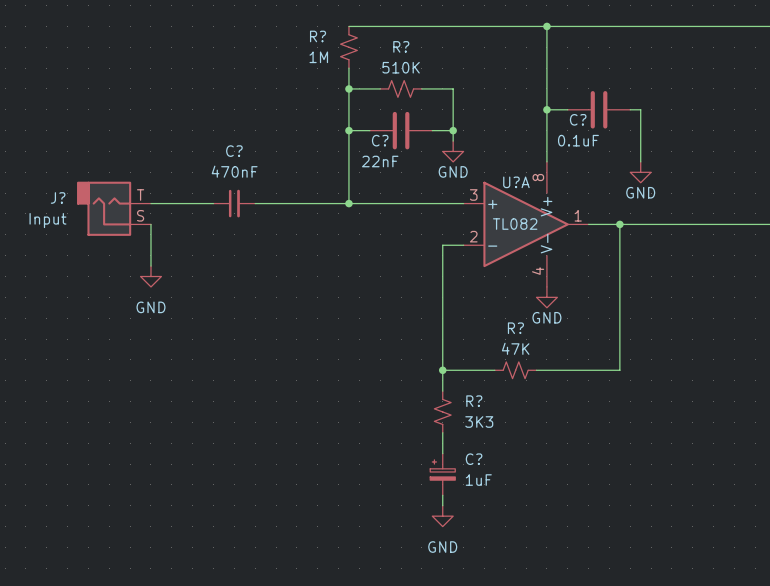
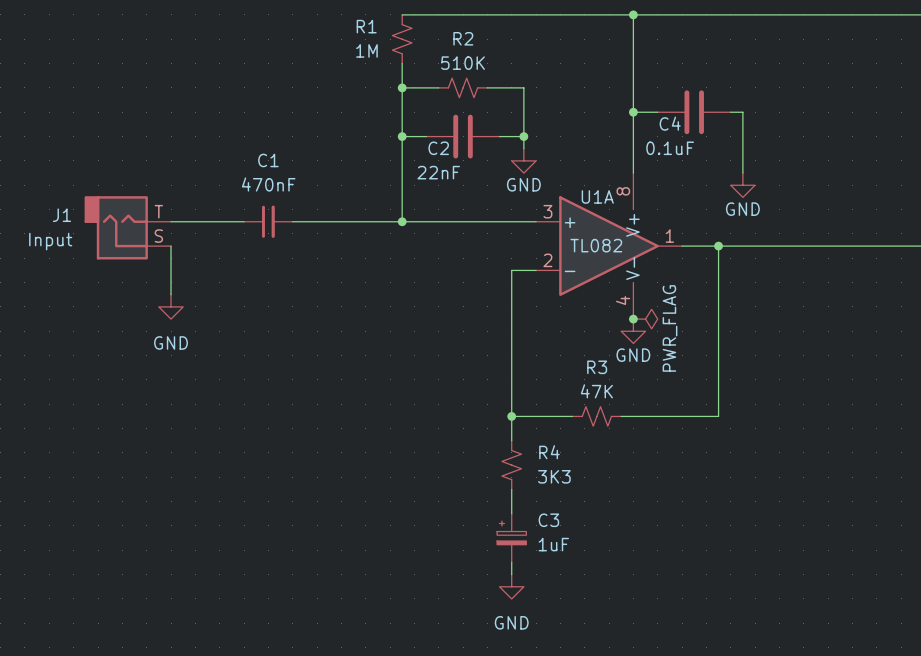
R? name: R? (318, 36) -> R1 (366, 26)
R? name: R? (401, 46) -> R2 (463, 38)
C? name: C? (578, 119) -> C4 (670, 123)
C? name: C? (380, 140) -> C2 (438, 148)
C? name: C? (234, 151) -> C1 (268, 160)
U?A name: U?A (516, 182) -> U1A (597, 196)
J? name: J? (58, 197) -> J1 (61, 215)
junction: none -> (633, 319)
power symbol: none -> PWR_FLAG (645, 319)
R? name: R? (515, 328) -> R3 (597, 367)
R? name: R? (474, 401) -> R4 (549, 452)
C? name: C? (474, 459) -> C3 (548, 520)

